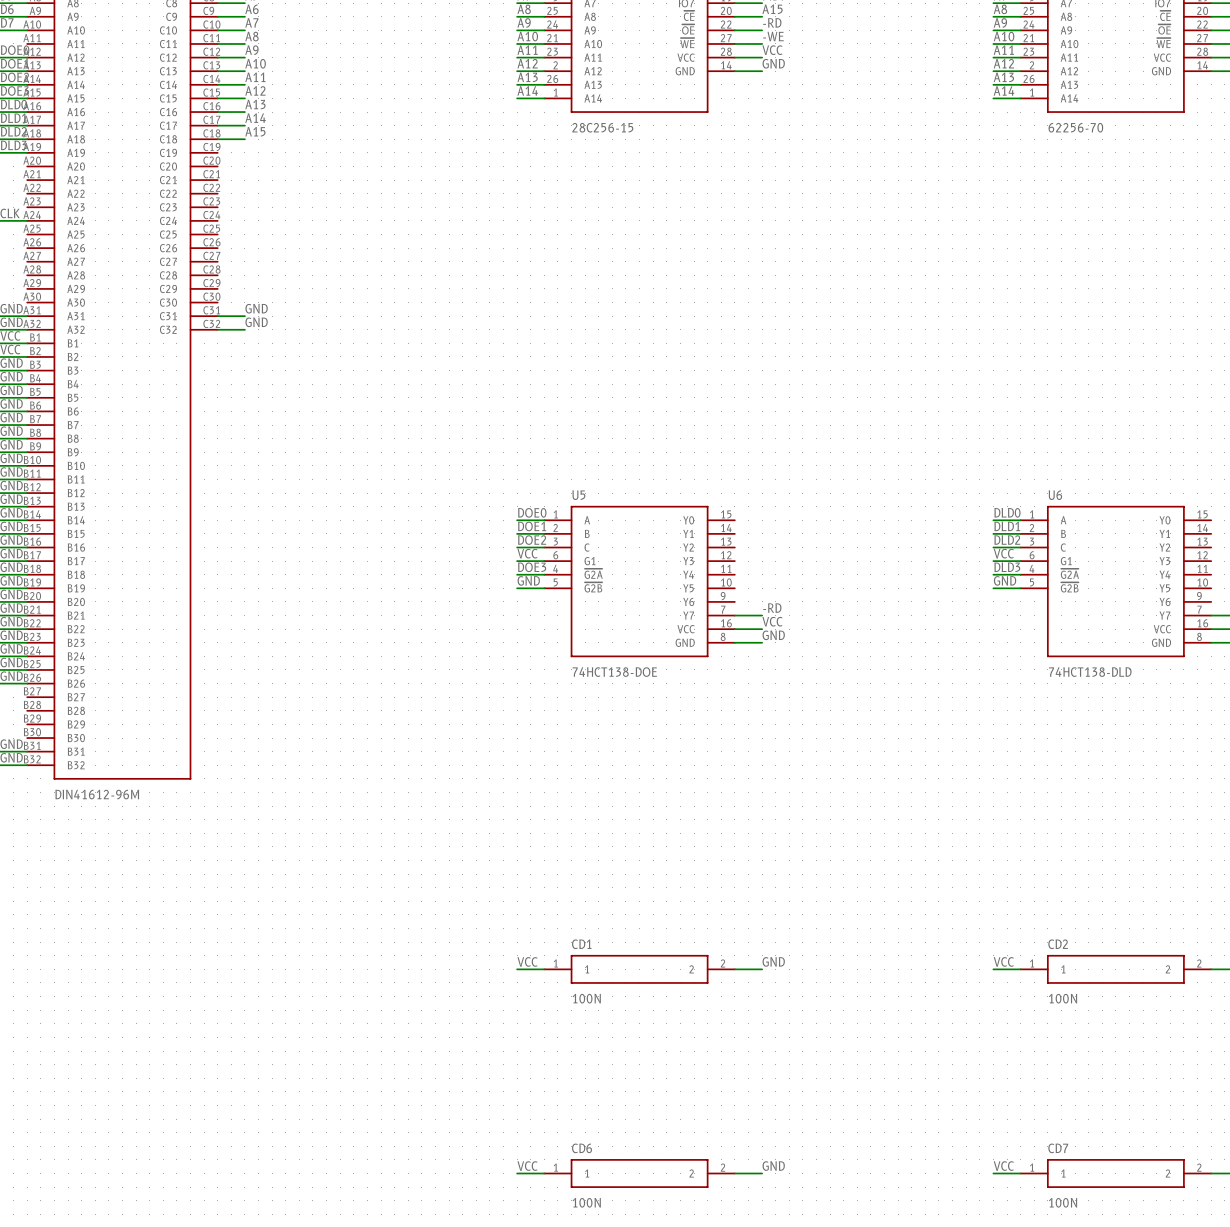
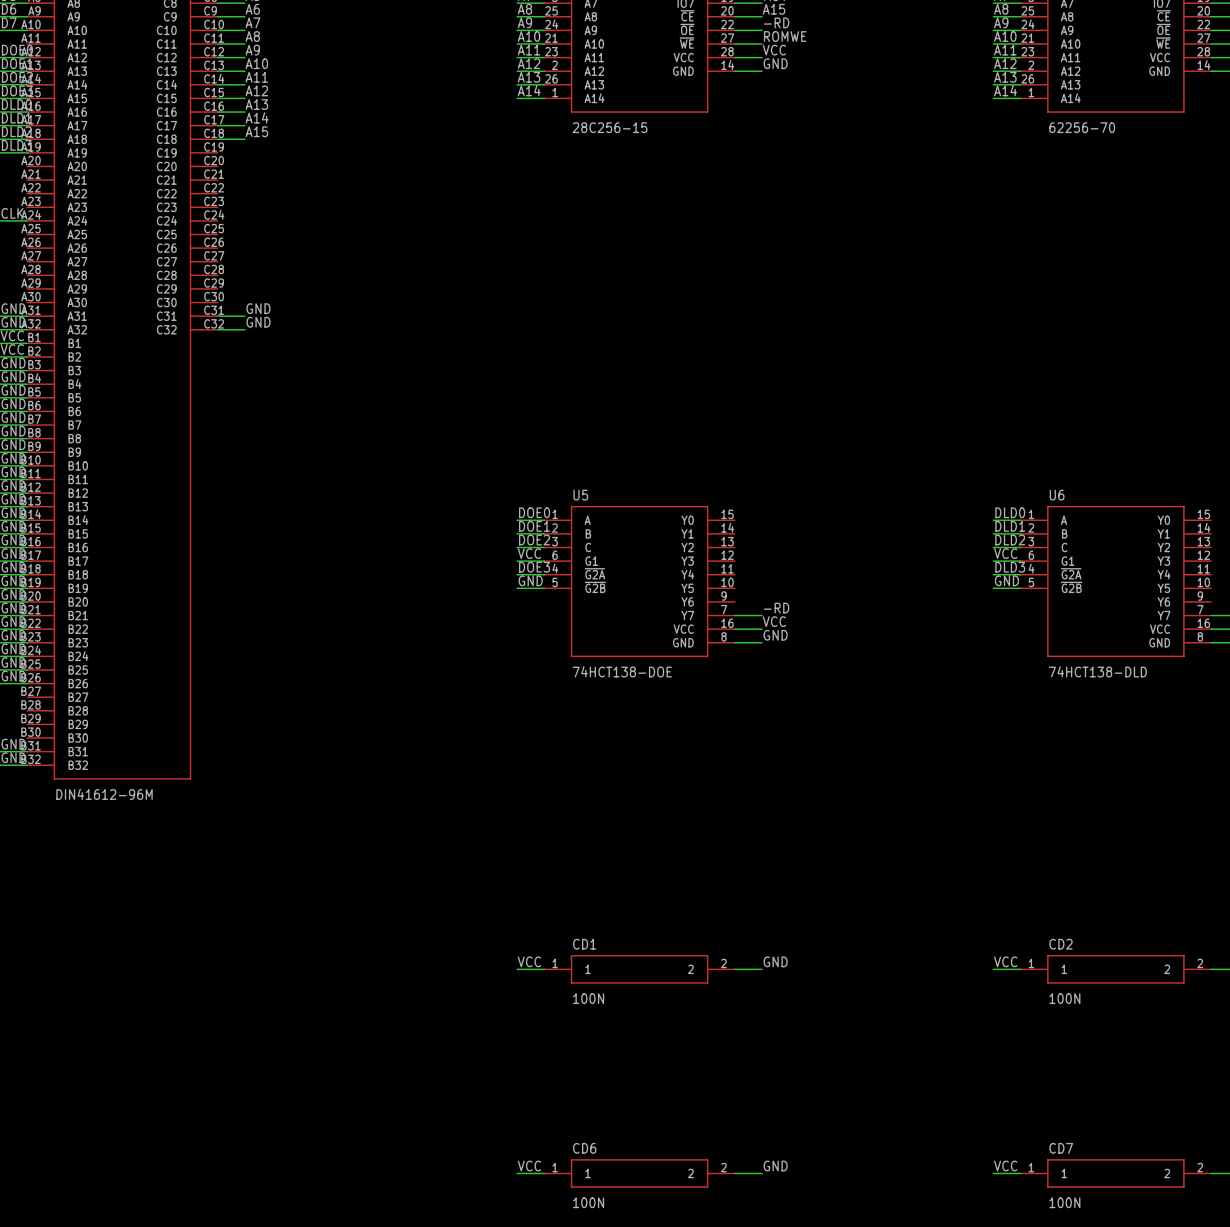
label: -WE (773, 36) -> ROMWE (785, 36)

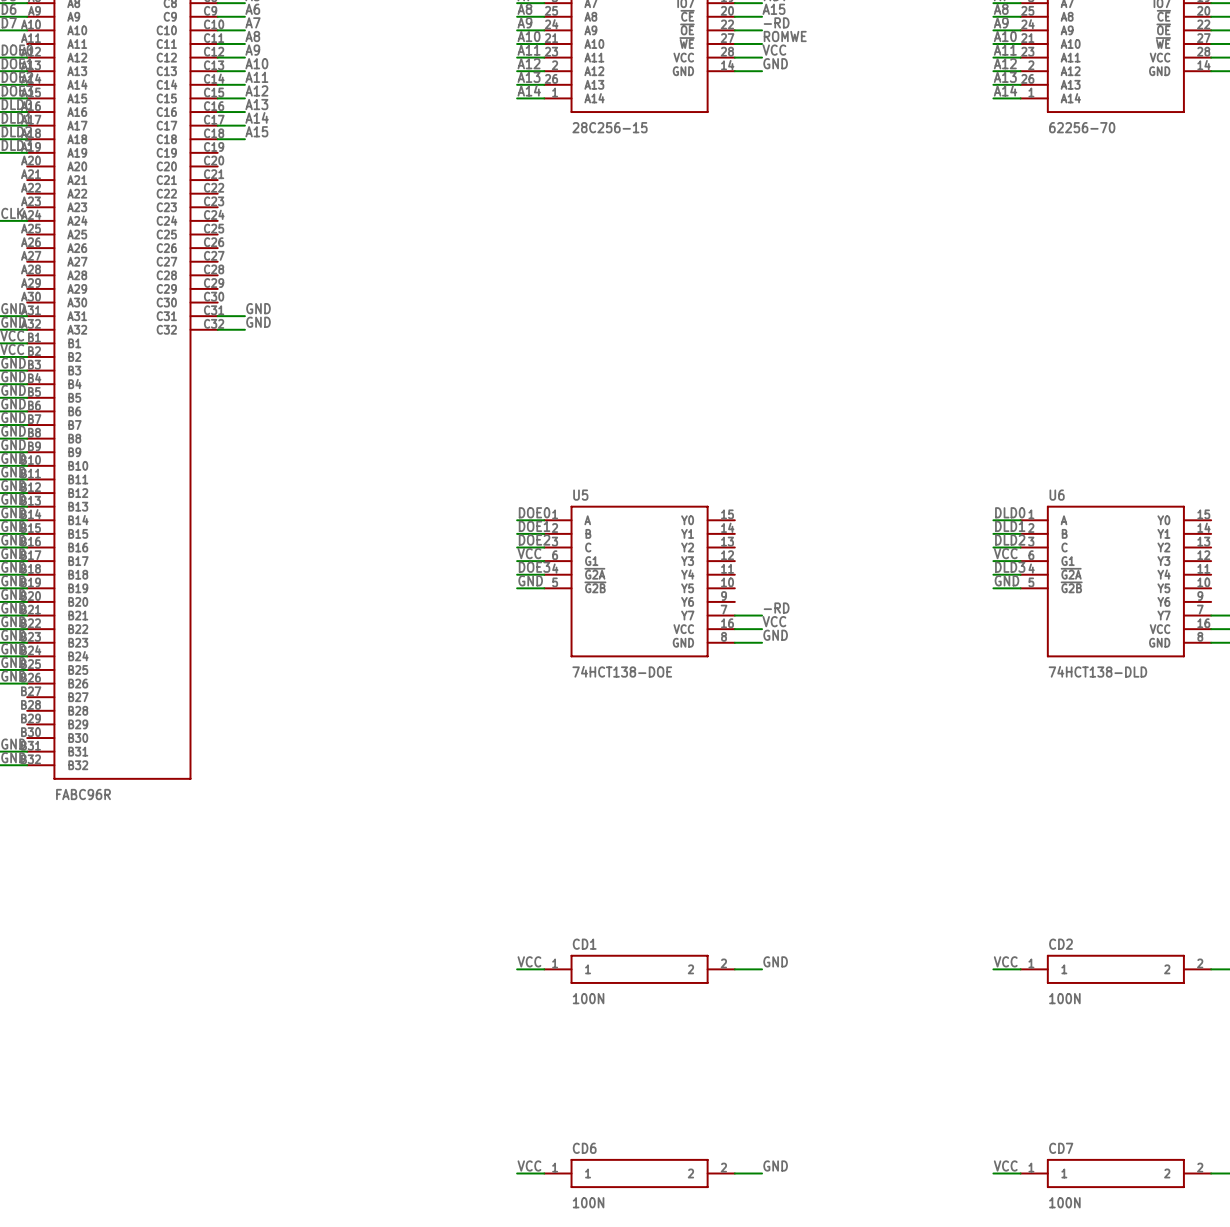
part value: DIN41612-96M (104, 794) -> FABC96R (83, 794)

